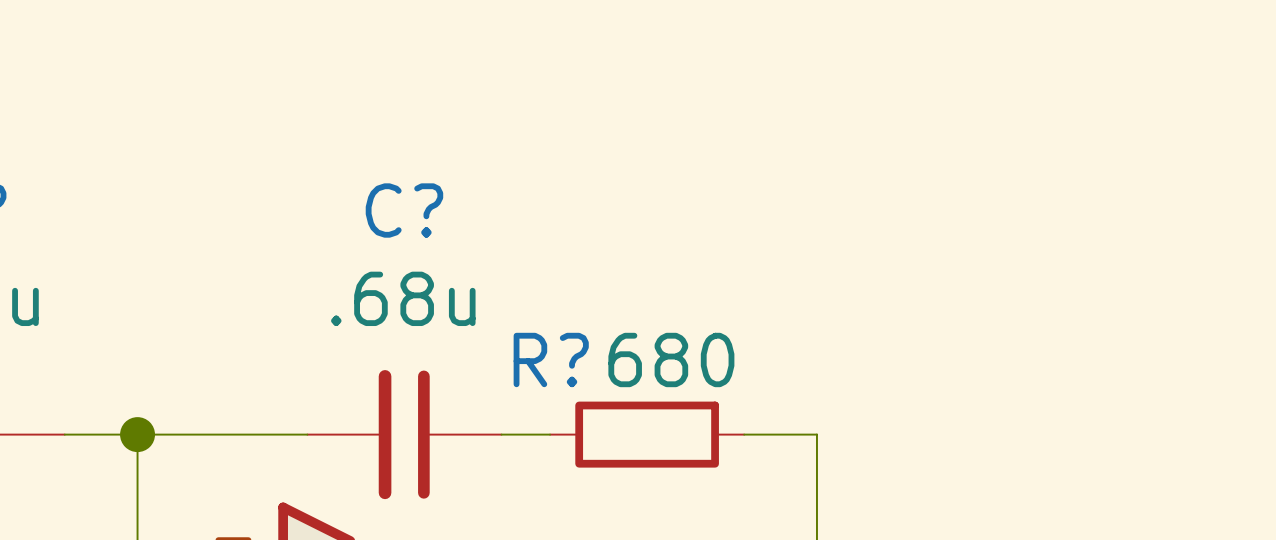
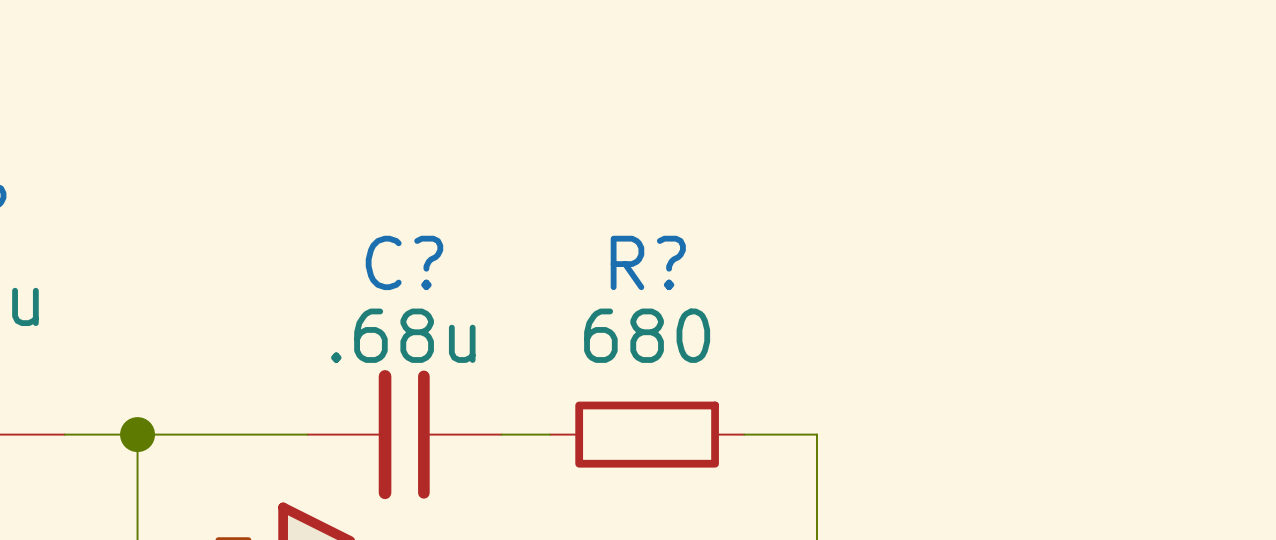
C? name position: C? (404, 210) -> C? (404, 262)
C? value position: .68u (403, 298) -> .68u (403, 335)
R? name position: R? (551, 359) -> R? (648, 262)
R? value position: 680 (671, 359) -> 680 (647, 335)

